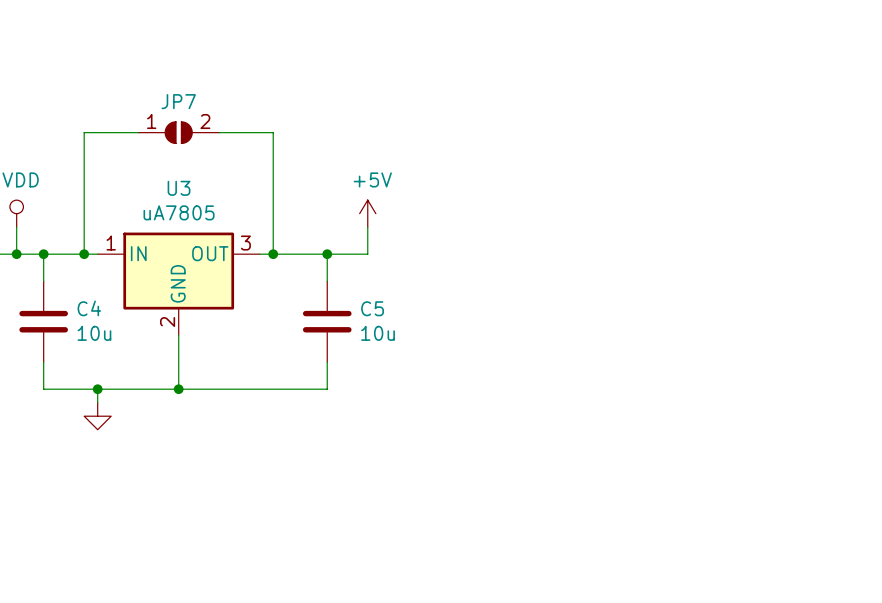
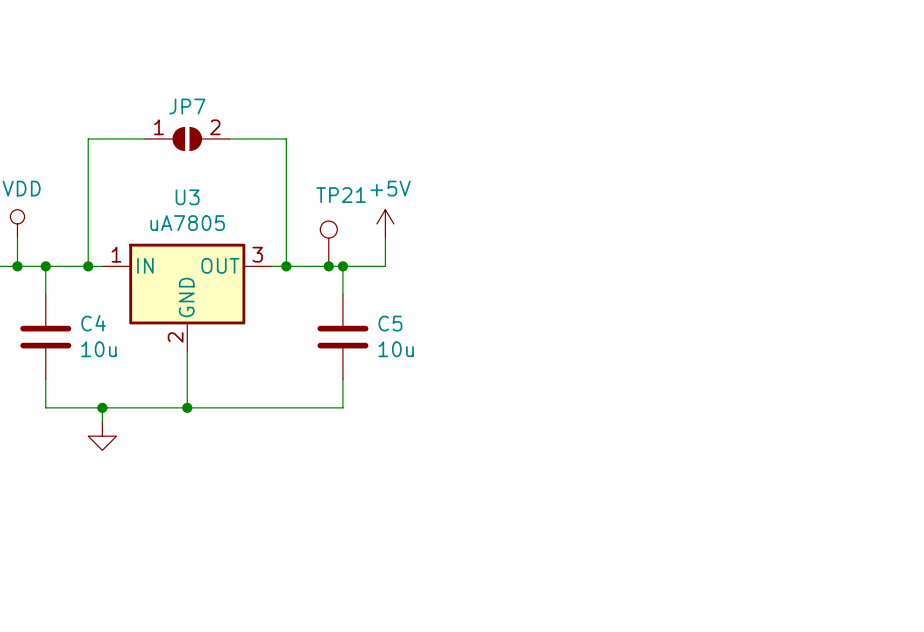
TP21: none -> (328, 243)
junction: none -> (328, 266)

